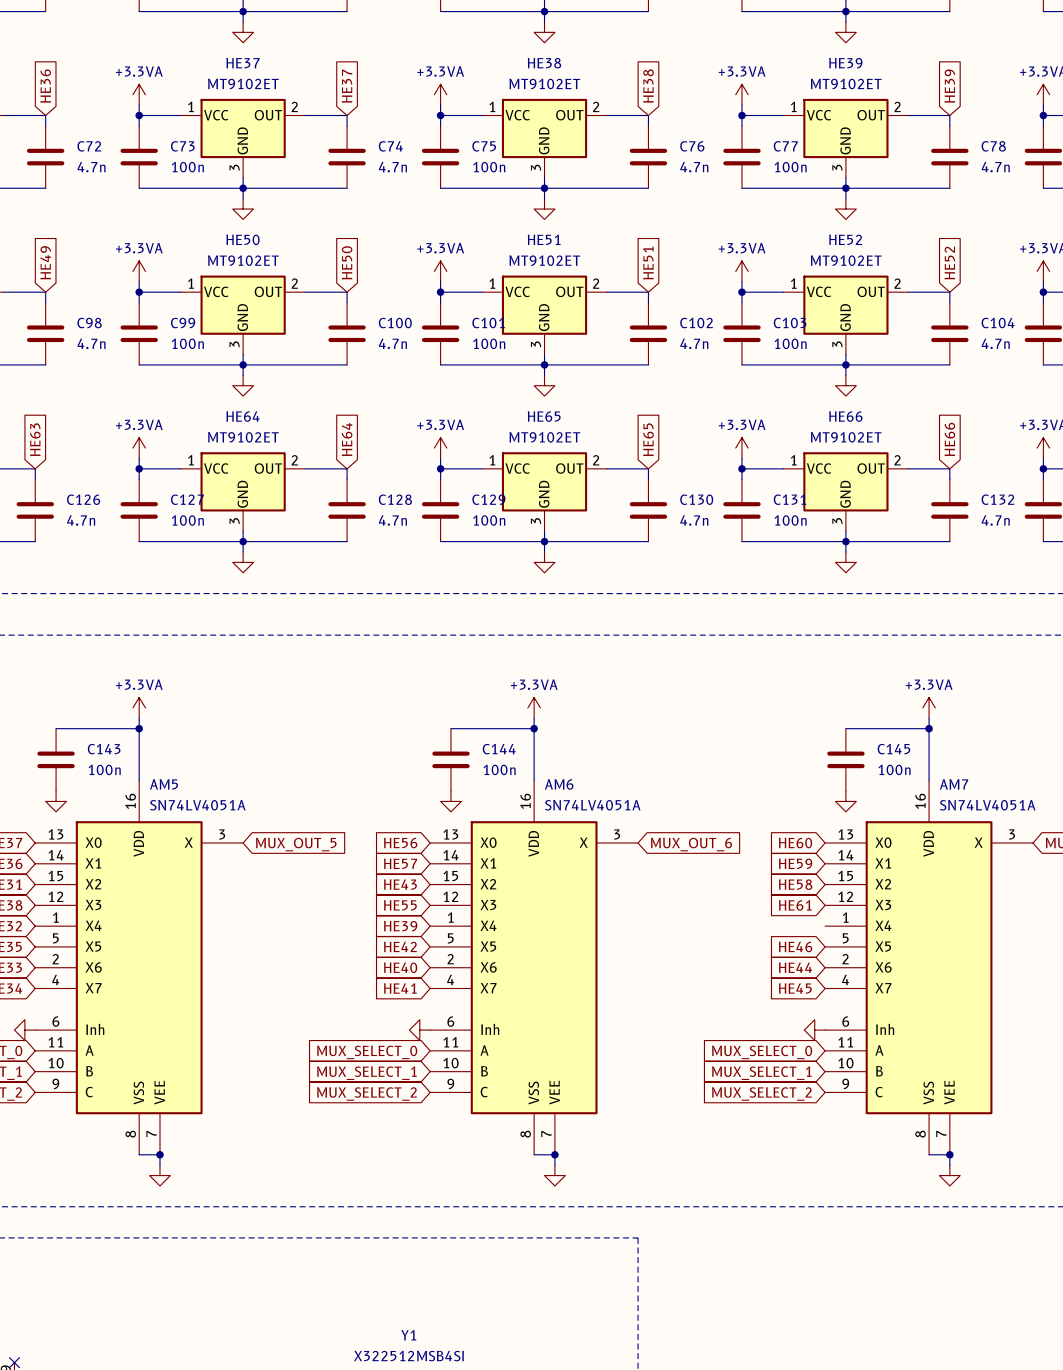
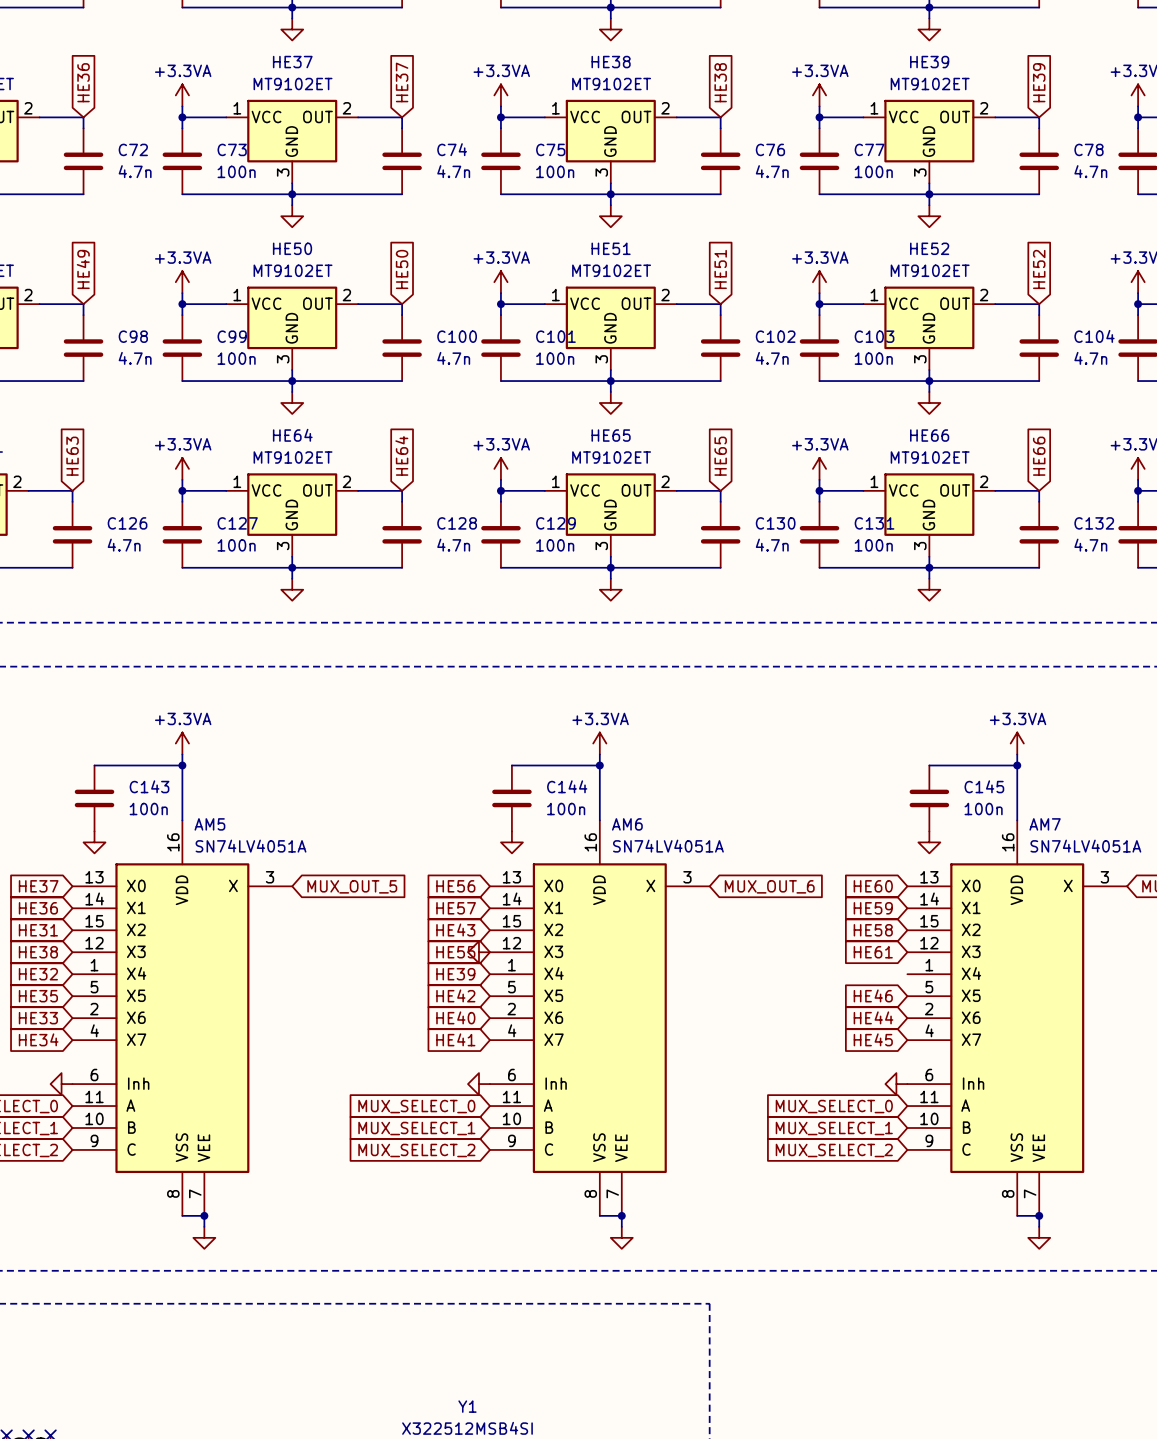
power symbol: none -> (478, 952)

